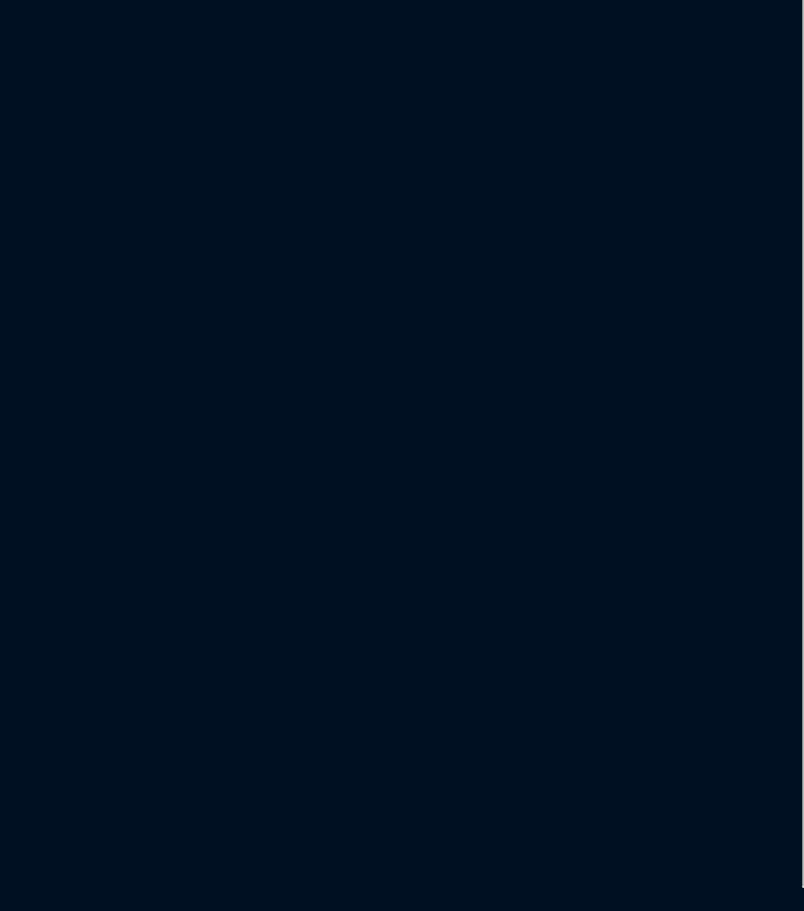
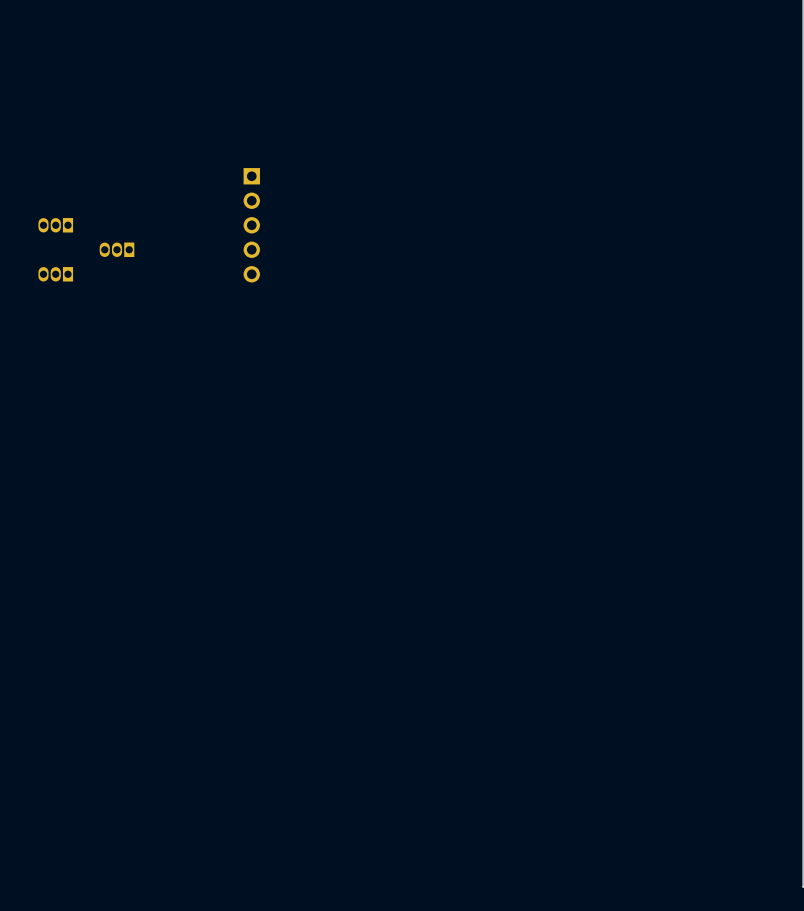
part: none -> (55, 225)
part: none -> (251, 225)
part: none -> (117, 249)
part: none -> (55, 274)

